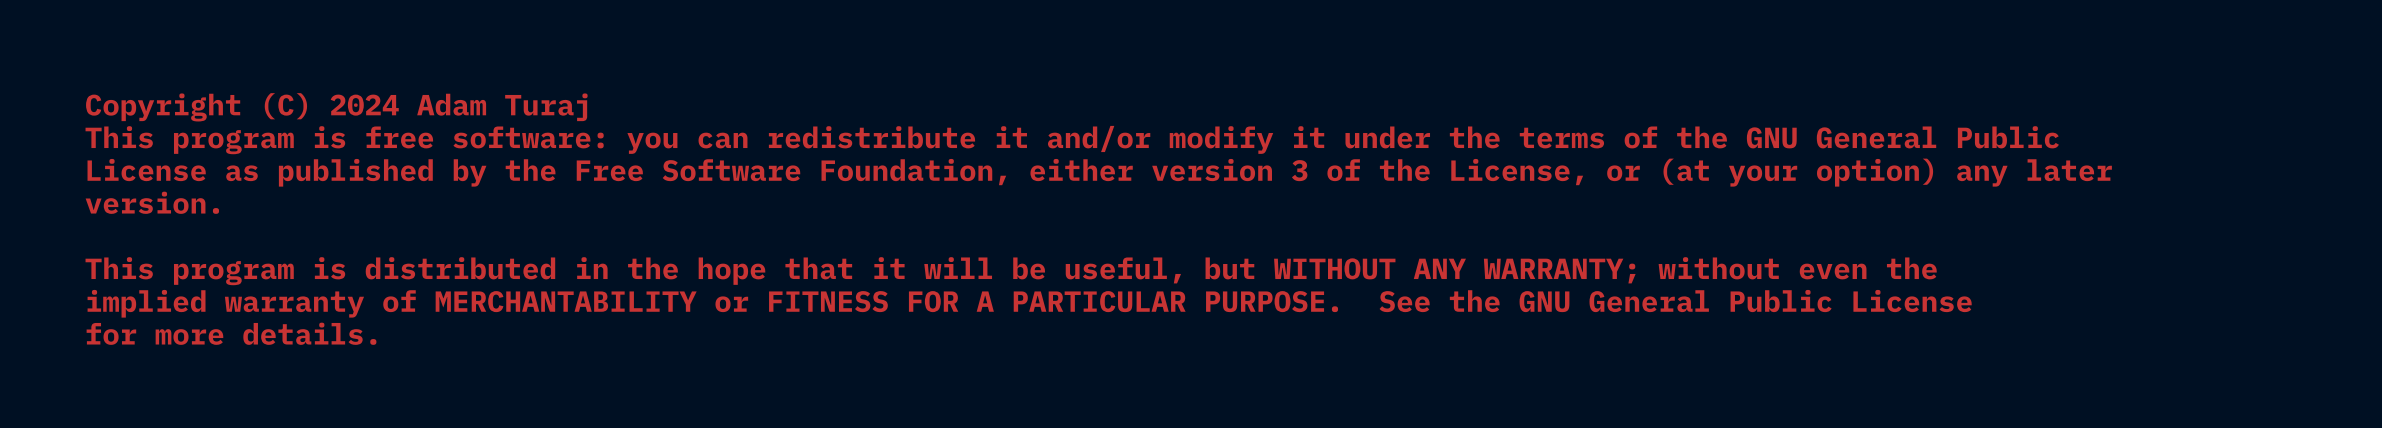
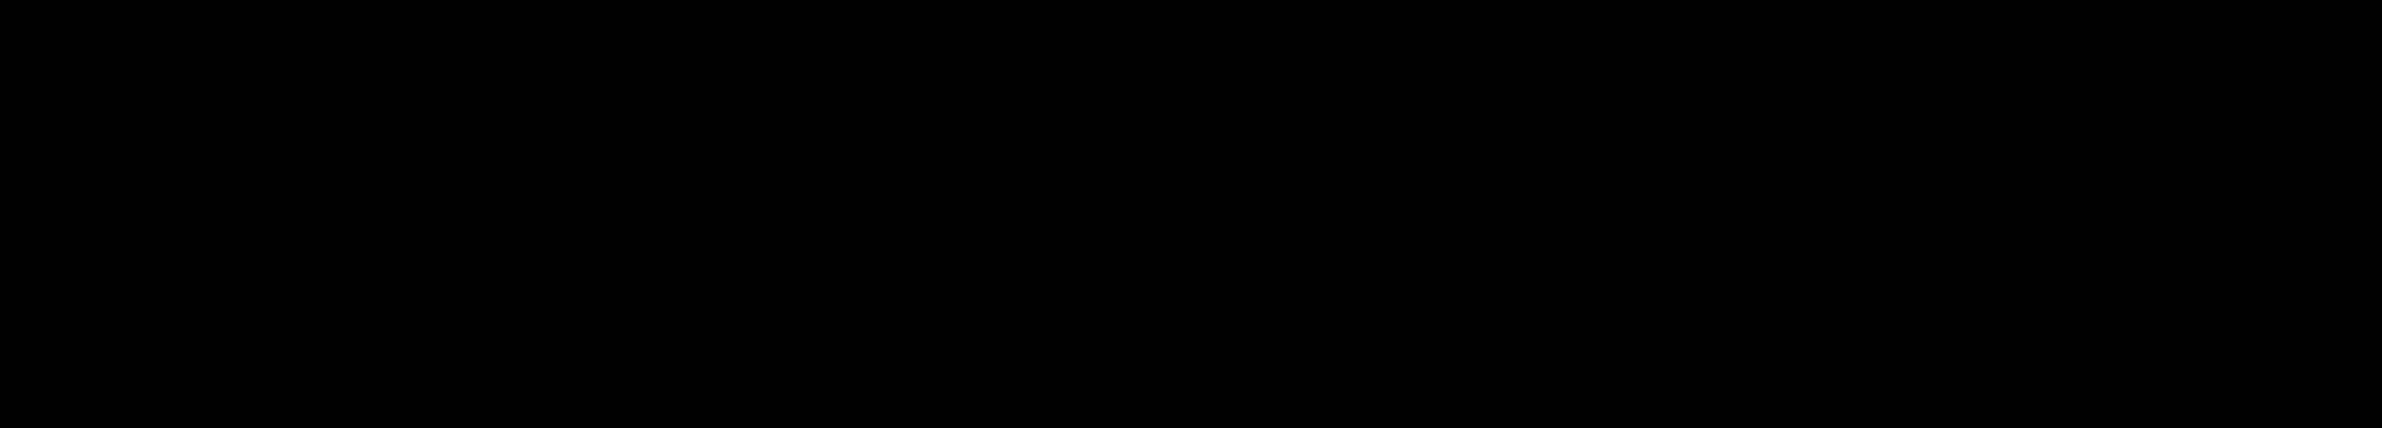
text: Copyright (C) 2024 Adam Turaj (336, 107) -> none
text: This program is free software: you can redistribute it and/or modify it under the terms of the GNU General Public (1072, 140) -> none
text: License as published by the Free Software Foundation, either version 3 of the License, or (at your option) any later (1099, 172) -> none
text: version. (152, 202) -> none
text: This program is distributed in the hope that it will be useful, but WITHOUT ANY WARRANTY; without even the (1011, 271) -> none
text: implied warranty of MERCHANTABILITY or FITNESS FOR A PARTICULAR PURPOSE. See the GNU General Public License (1029, 303) -> none
text: for more details. (231, 333) -> none

